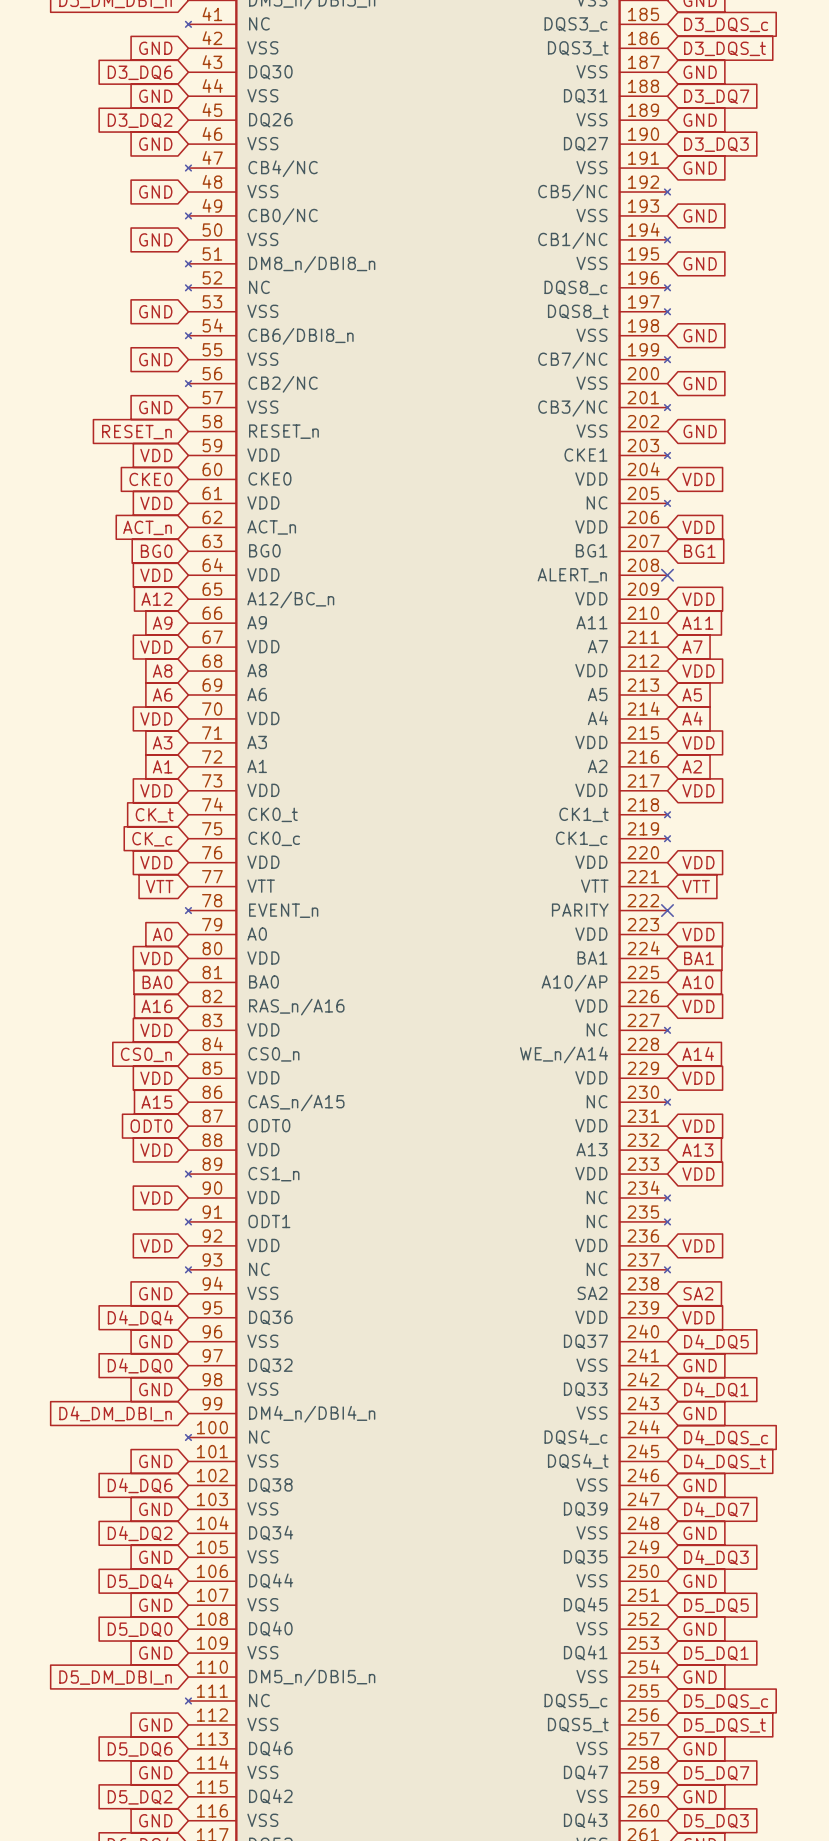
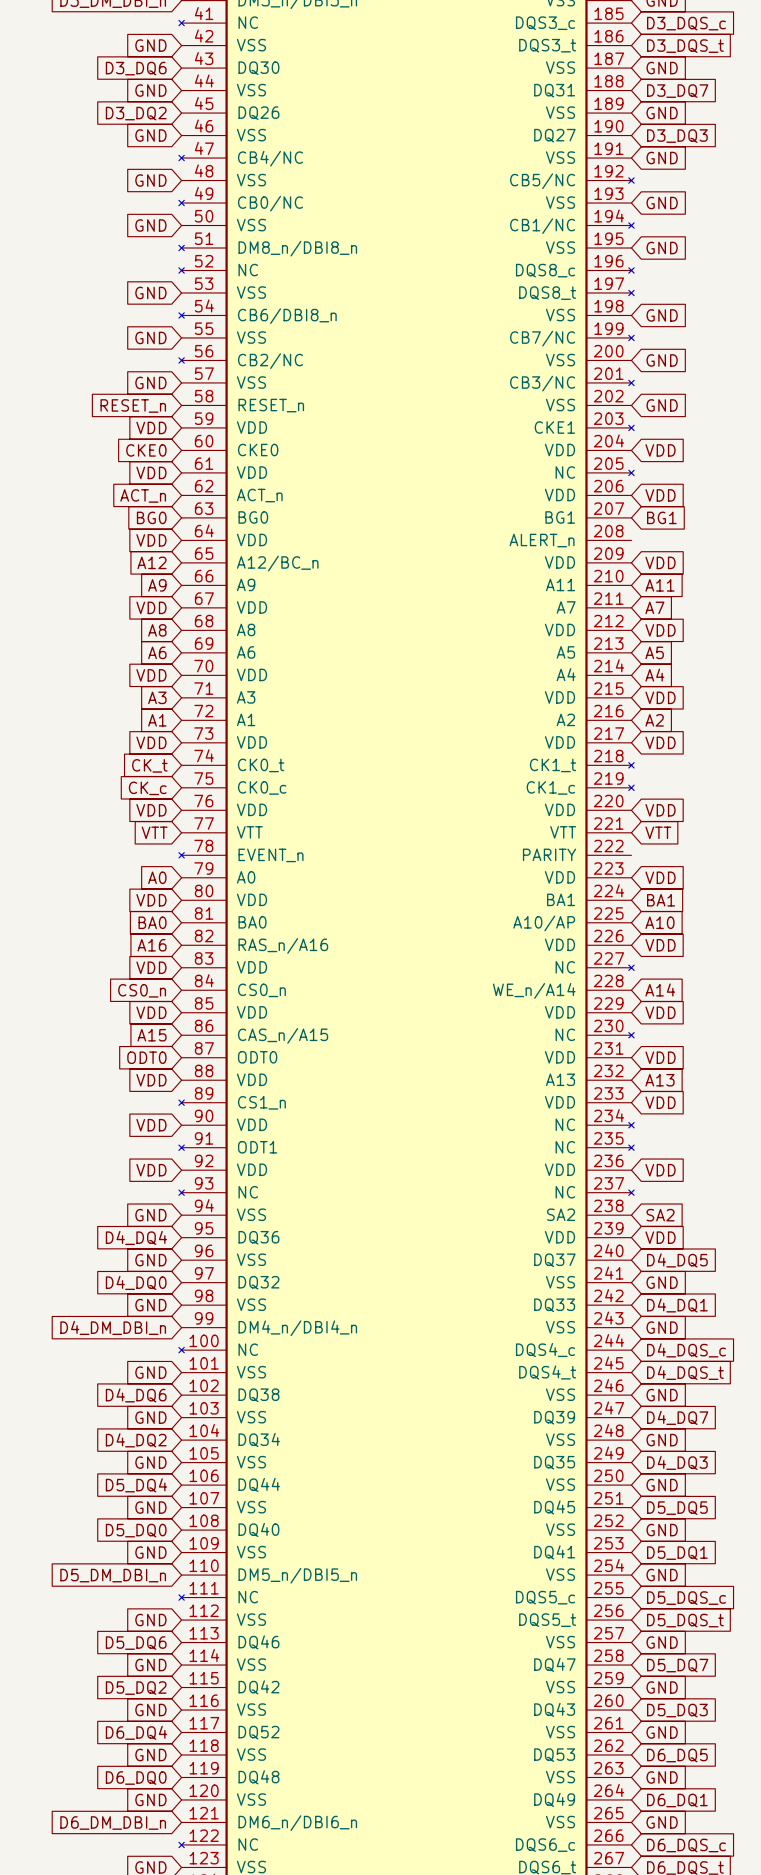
no-connect mark: (667, 575) -> none
no-connect mark: (667, 910) -> none

